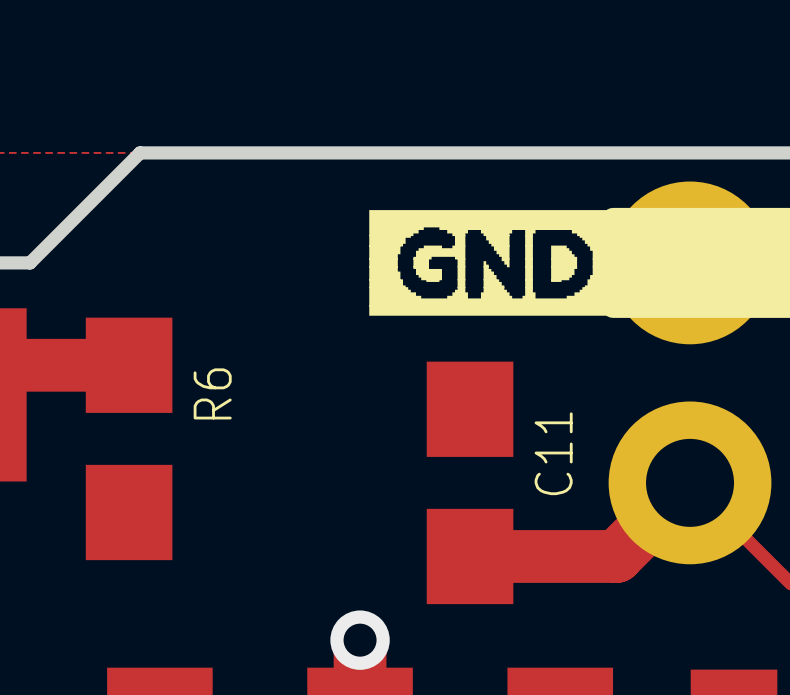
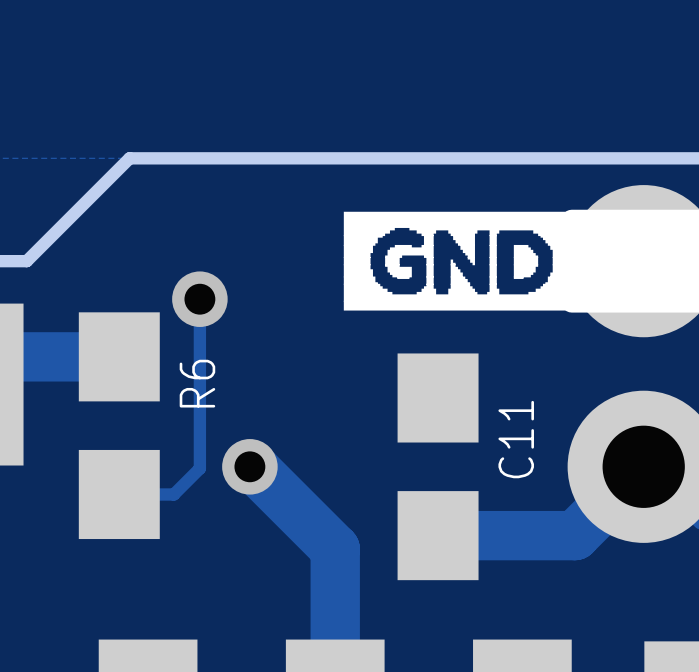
track: none -> (199, 299) (199, 468) (173, 494) (119, 494)
via: none -> (199, 299)
track: none -> (249, 466) (252, 466) (335, 549) (335, 613)
via position: (360, 640) -> (249, 466)

